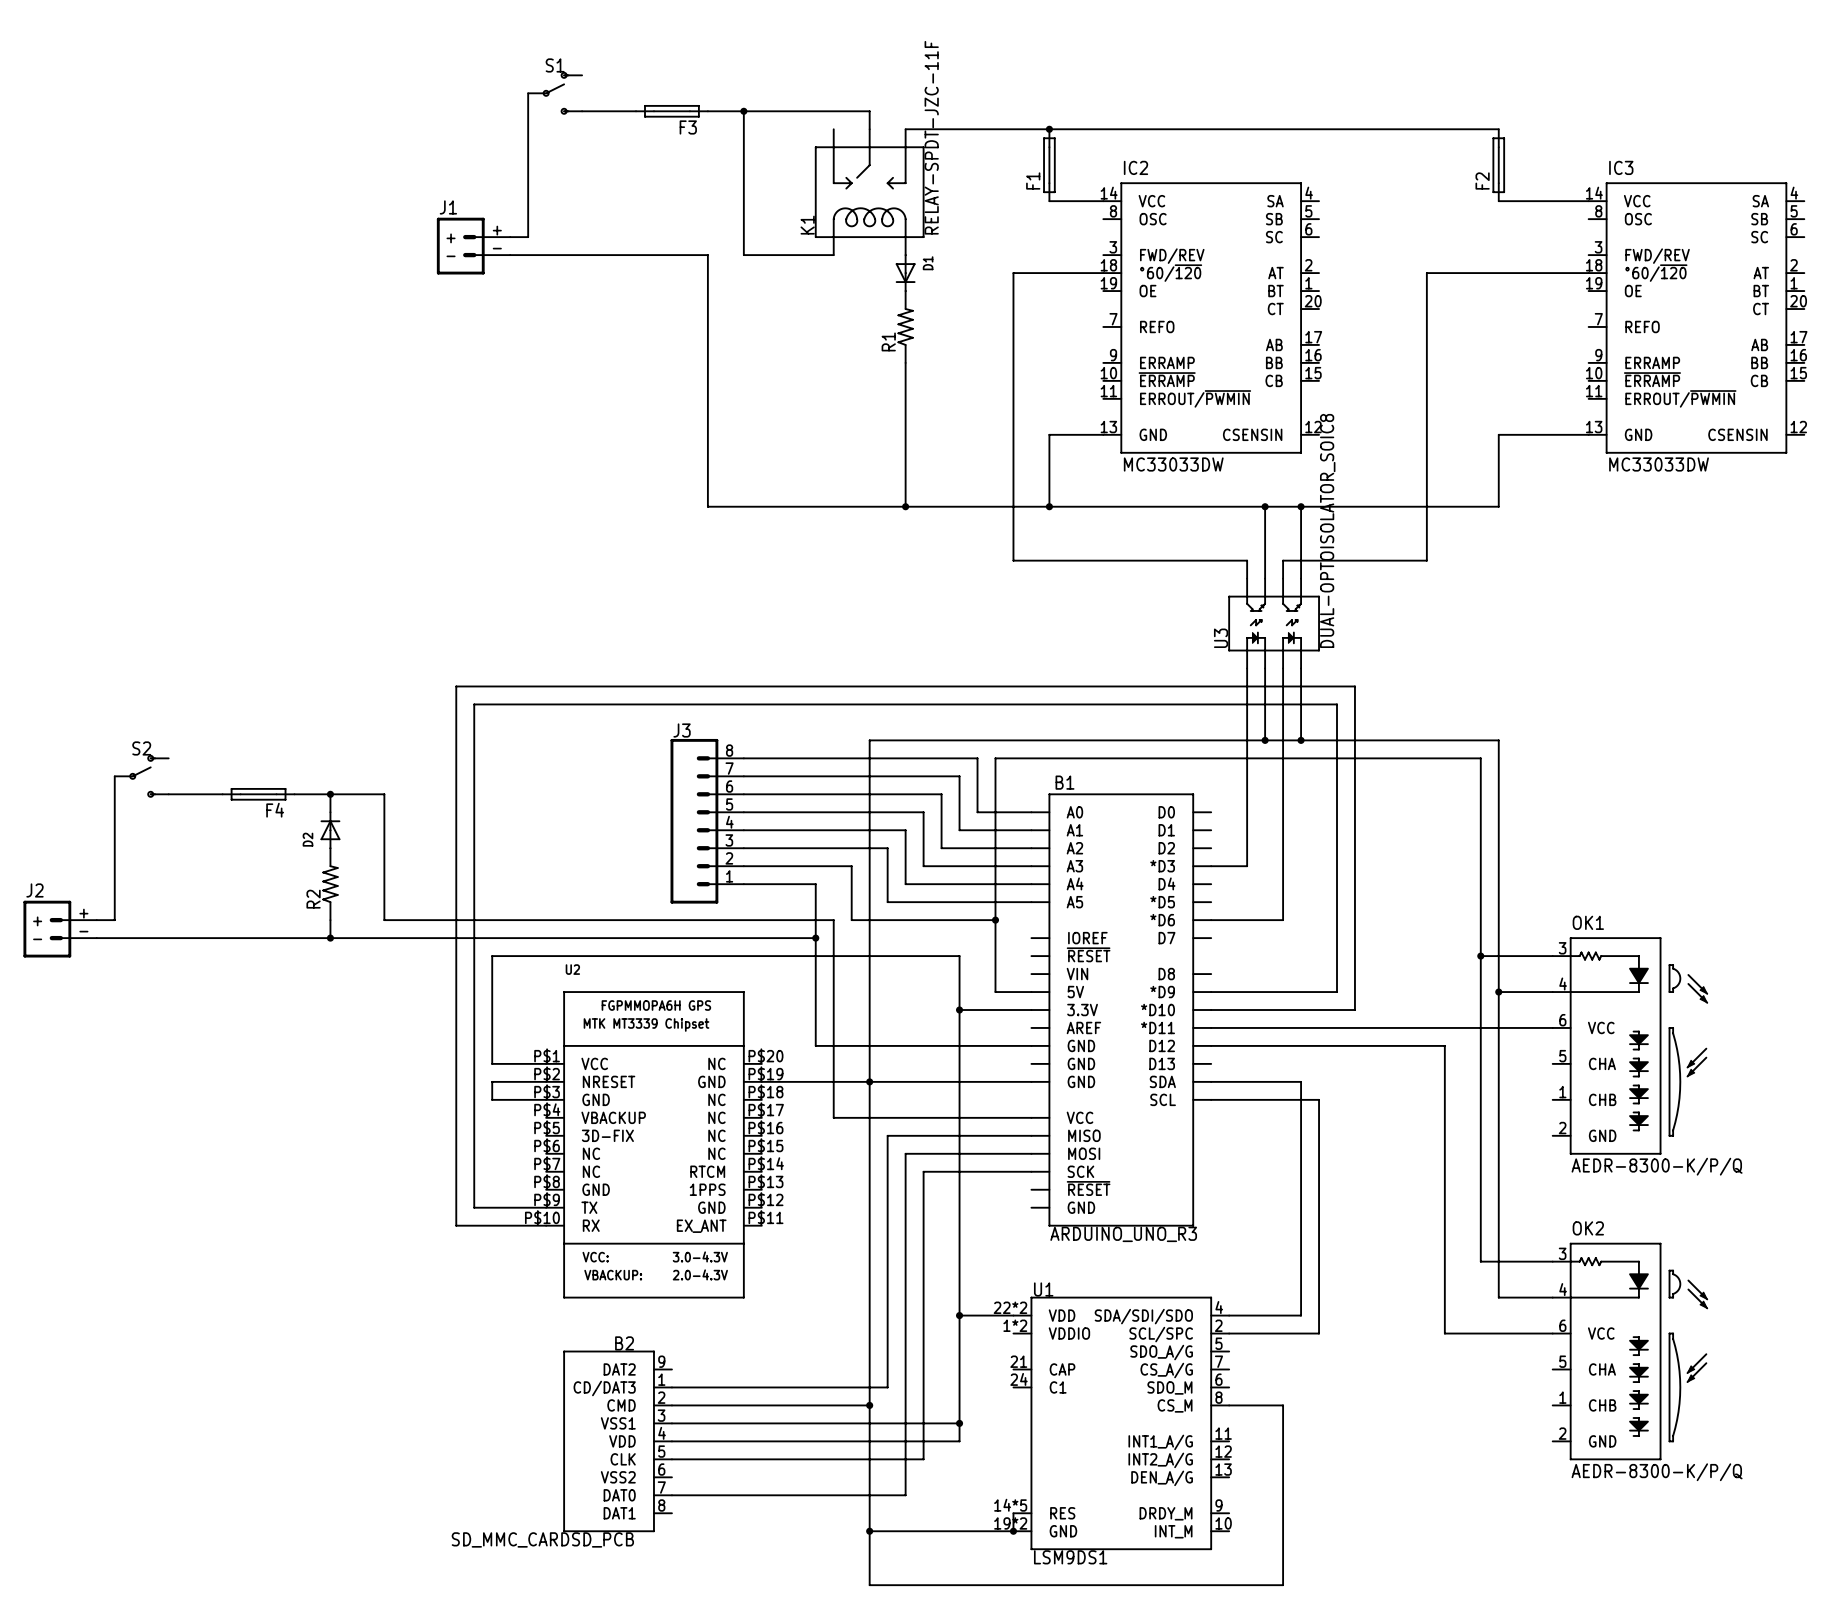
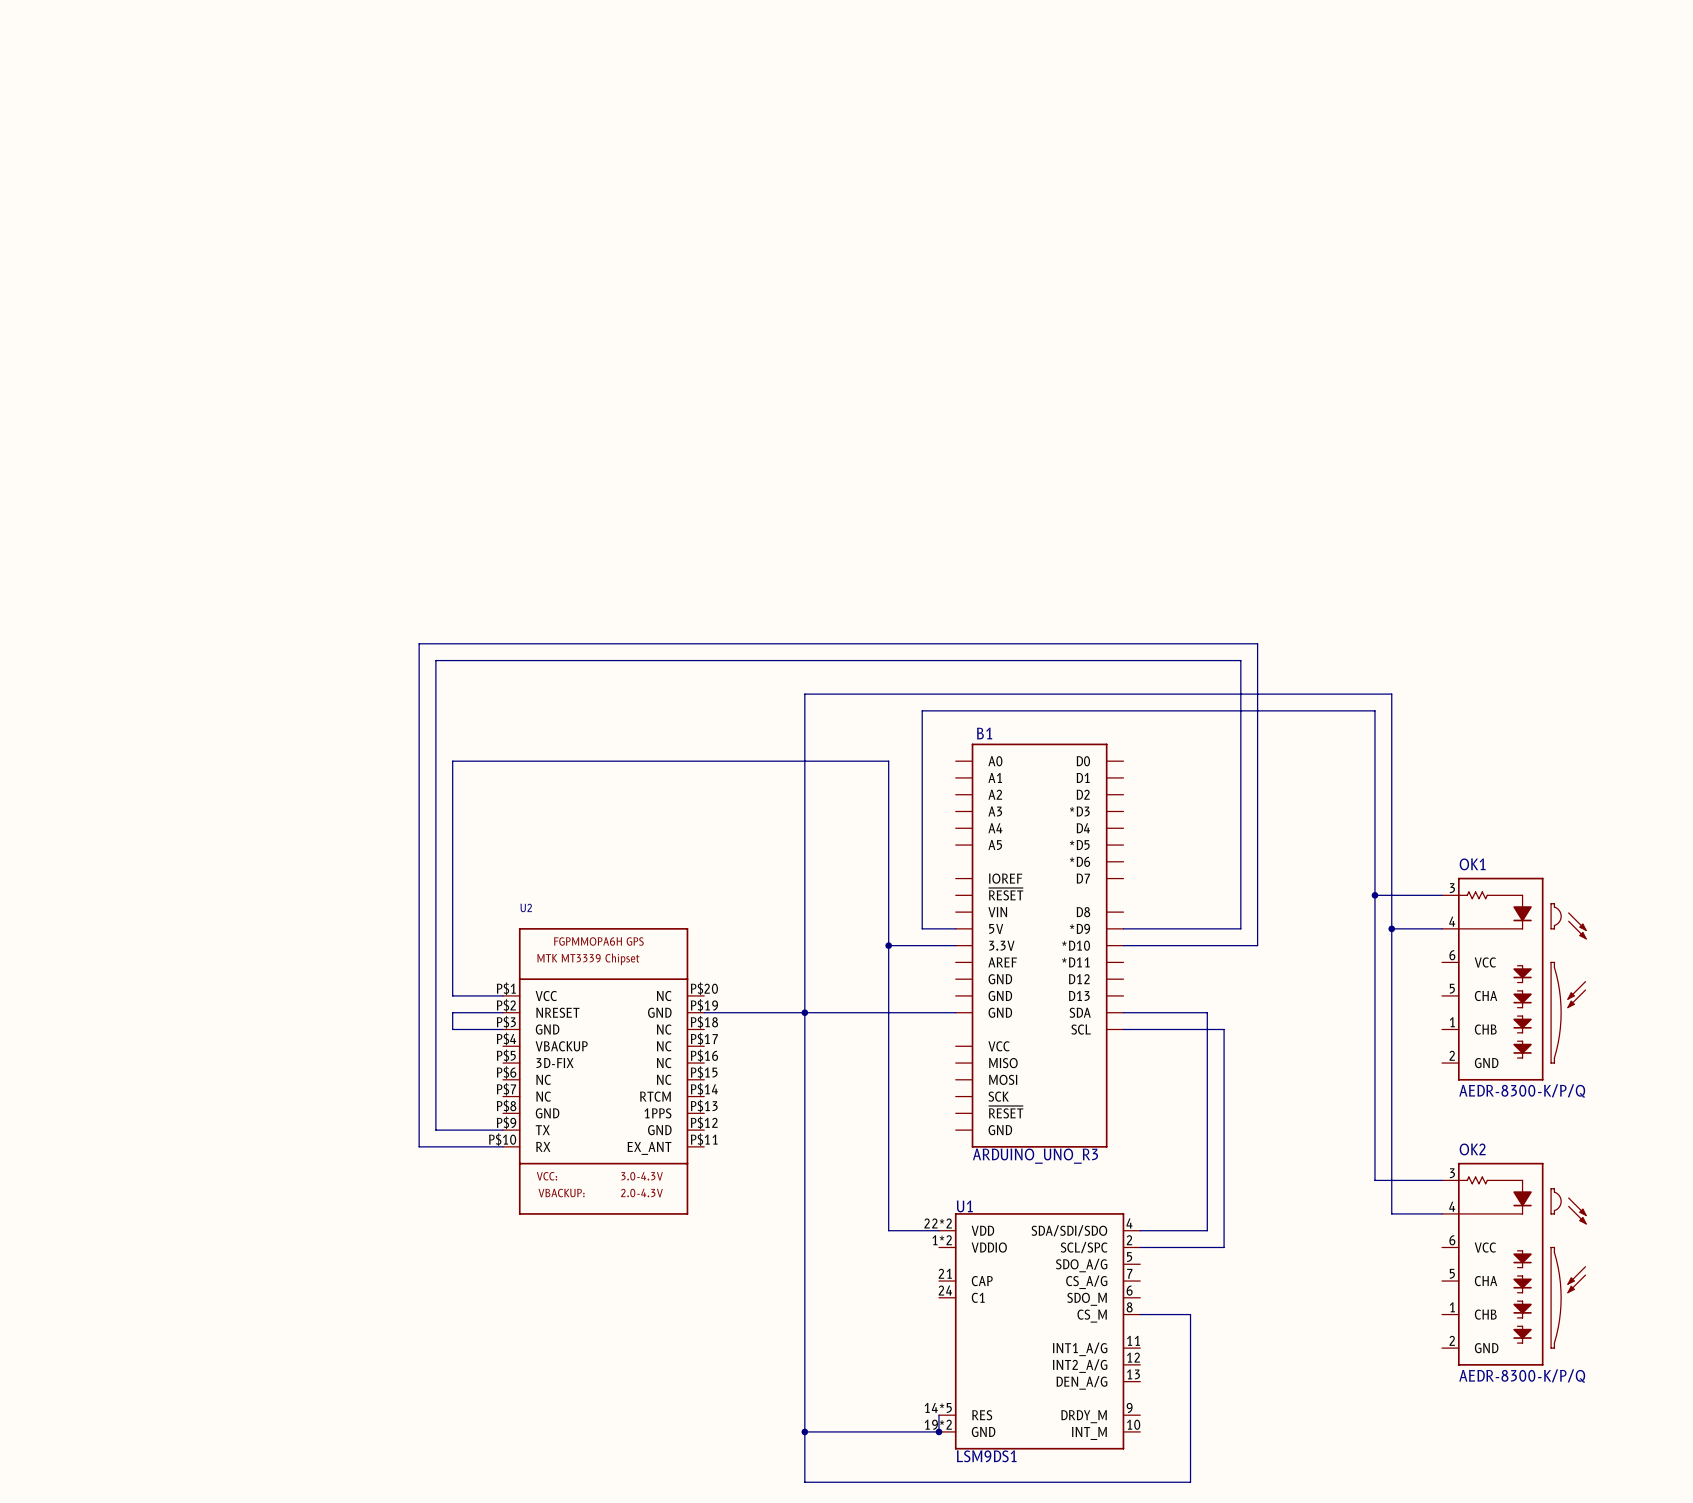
wire: (528, 93) (528, 237) (510, 237) -> none
S1: (555, 93) -> none
wire: (582, 111) (636, 111) -> none
F3: (671, 111) -> none
wire: (707, 111) (869, 111) (869, 129) -> none
wire: (743, 111) (743, 255) (833, 255) -> none
junction: (743, 111) -> none
wire: (905, 129) (1498, 129) -> none
junction: (1049, 129) -> none
F1: (1049, 165) -> none
F2: (1498, 165) -> none
K1: RELAY-SPDT-JZC-11F (869, 192) -> none
wire: (1049, 201) (1103, 201) -> none
wire: (1498, 201) (1588, 201) -> none
J1: (473, 246) -> none
wire: (510, 255) (707, 255) (707, 506) (1498, 506) (1498, 434) (1588, 434) -> none
D1: (905, 273) -> none
wire: (1103, 273) (1013, 273) (1013, 560) (1247, 560) (1247, 578) -> none
wire: (1588, 273) (1426, 273) (1426, 560) (1283, 560) (1283, 578) -> none
IC2: MC33033DW (1211, 318) -> none
IC3: MC33033DW (1696, 318) -> none
R1: (905, 326) -> none
wire: (905, 362) (905, 506) -> none
wire: (1103, 434) (1049, 434) (1049, 506) -> none
junction: (905, 506) -> none
junction: (1049, 506) -> none
wire: (1265, 506) (1265, 578) -> none
junction: (1265, 506) -> none
wire: (1301, 506) (1301, 578) -> none
junction: (1301, 506) -> none
U3: DUAL-OPTOISOLATOR_SOIC8 (1274, 623) -> none
wire: (1247, 668) (1247, 866) (1211, 866) -> none
wire: (1265, 668) (1265, 740) -> none
wire: (1283, 668) (1283, 920) (1211, 920) -> none
wire: (1301, 668) (1301, 740) -> none
junction: (1265, 740) -> none
junction: (1301, 740) -> none
wire: (743, 758) (977, 758) (977, 812) (1031, 812) -> none
wire: (114, 776) (114, 920) (96, 920) -> none
S2: (141, 776) -> none
wire: (743, 776) (959, 776) (959, 812) -> none
wire: (168, 794) (222, 794) -> none
F4: (258, 794) -> none
wire: (294, 794) (384, 794) (384, 920) (833, 920) (833, 1117) (1031, 1117) -> none
wire: (330, 794) (330, 812) -> none
junction: (330, 794) -> none
wire: (743, 794) (941, 794) (941, 848) (1031, 848) -> none
wire: (923, 812) (923, 866) (1031, 866) -> (855, 761) (888, 761)
J3: (707, 821) -> none
D2: (330, 830) -> none
wire: (743, 830) (905, 830) (905, 884) (1031, 884) -> none
wire: (959, 830) (1031, 830) -> (888, 777) (888, 895)
wire: (743, 848) (887, 848) (887, 902) (1031, 902) -> none
wire: (743, 866) (851, 866) (851, 920) (995, 920) -> none
R2: (330, 884) -> none
wire: (743, 884) (815, 884) (815, 1045) (1031, 1045) -> none
wire: (330, 920) (330, 938) -> none
junction: (995, 920) -> none
J2: (60, 929) -> none
wire: (96, 938) (815, 938) -> none
junction: (330, 938) -> none
junction: (815, 938) -> none
wire: (492, 956) (959, 956) -> (452, 895) (452, 761) (687, 761)
wire: (1211, 1027) (1552, 1027) -> none
wire: (1211, 1045) (1444, 1045) (1444, 1333) (1552, 1333) -> none
wire: (1031, 1135) (887, 1135) (887, 1387) (671, 1387) -> none
wire: (1031, 1153) (905, 1153) (905, 1495) (671, 1495) -> none
wire: (1031, 1171) (923, 1171) (923, 1459) (671, 1459) -> none
wire: (959, 1315) (959, 1441) (671, 1441) -> none
junction: (959, 1315) -> none
wire: (671, 1405) (869, 1405) -> none
junction: (869, 1405) -> none
wire: (671, 1423) (959, 1423) -> none
junction: (959, 1423) -> none
B2: SD_MMC_CARDSD_PCB (617, 1441) -> none

